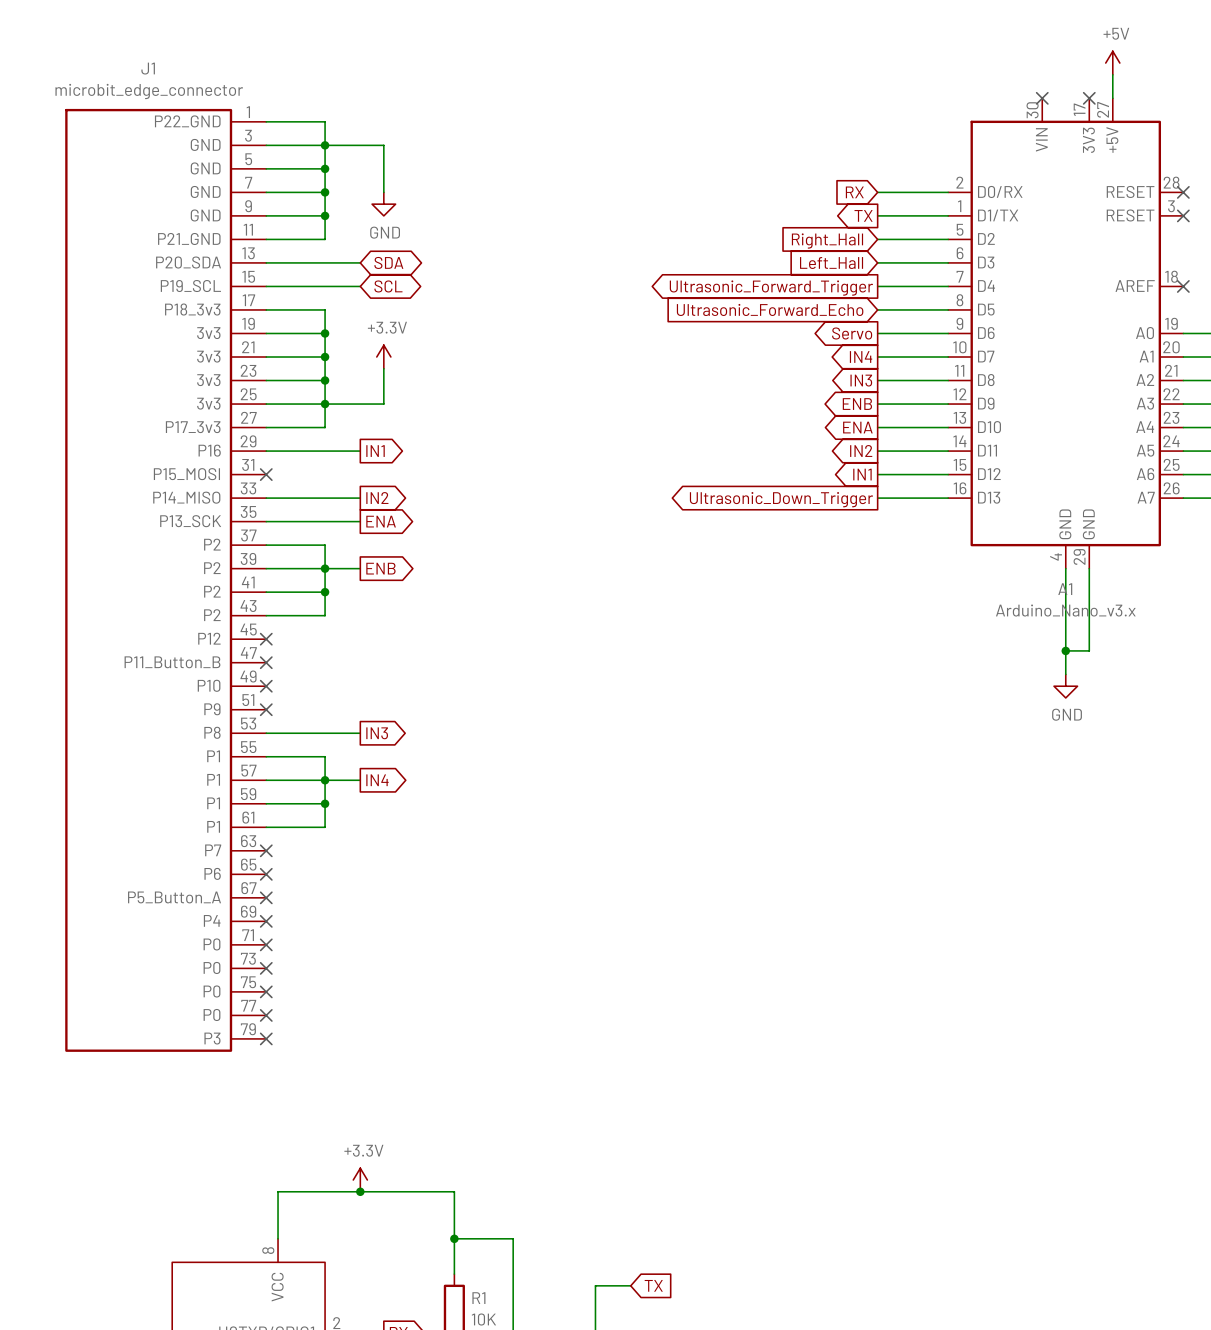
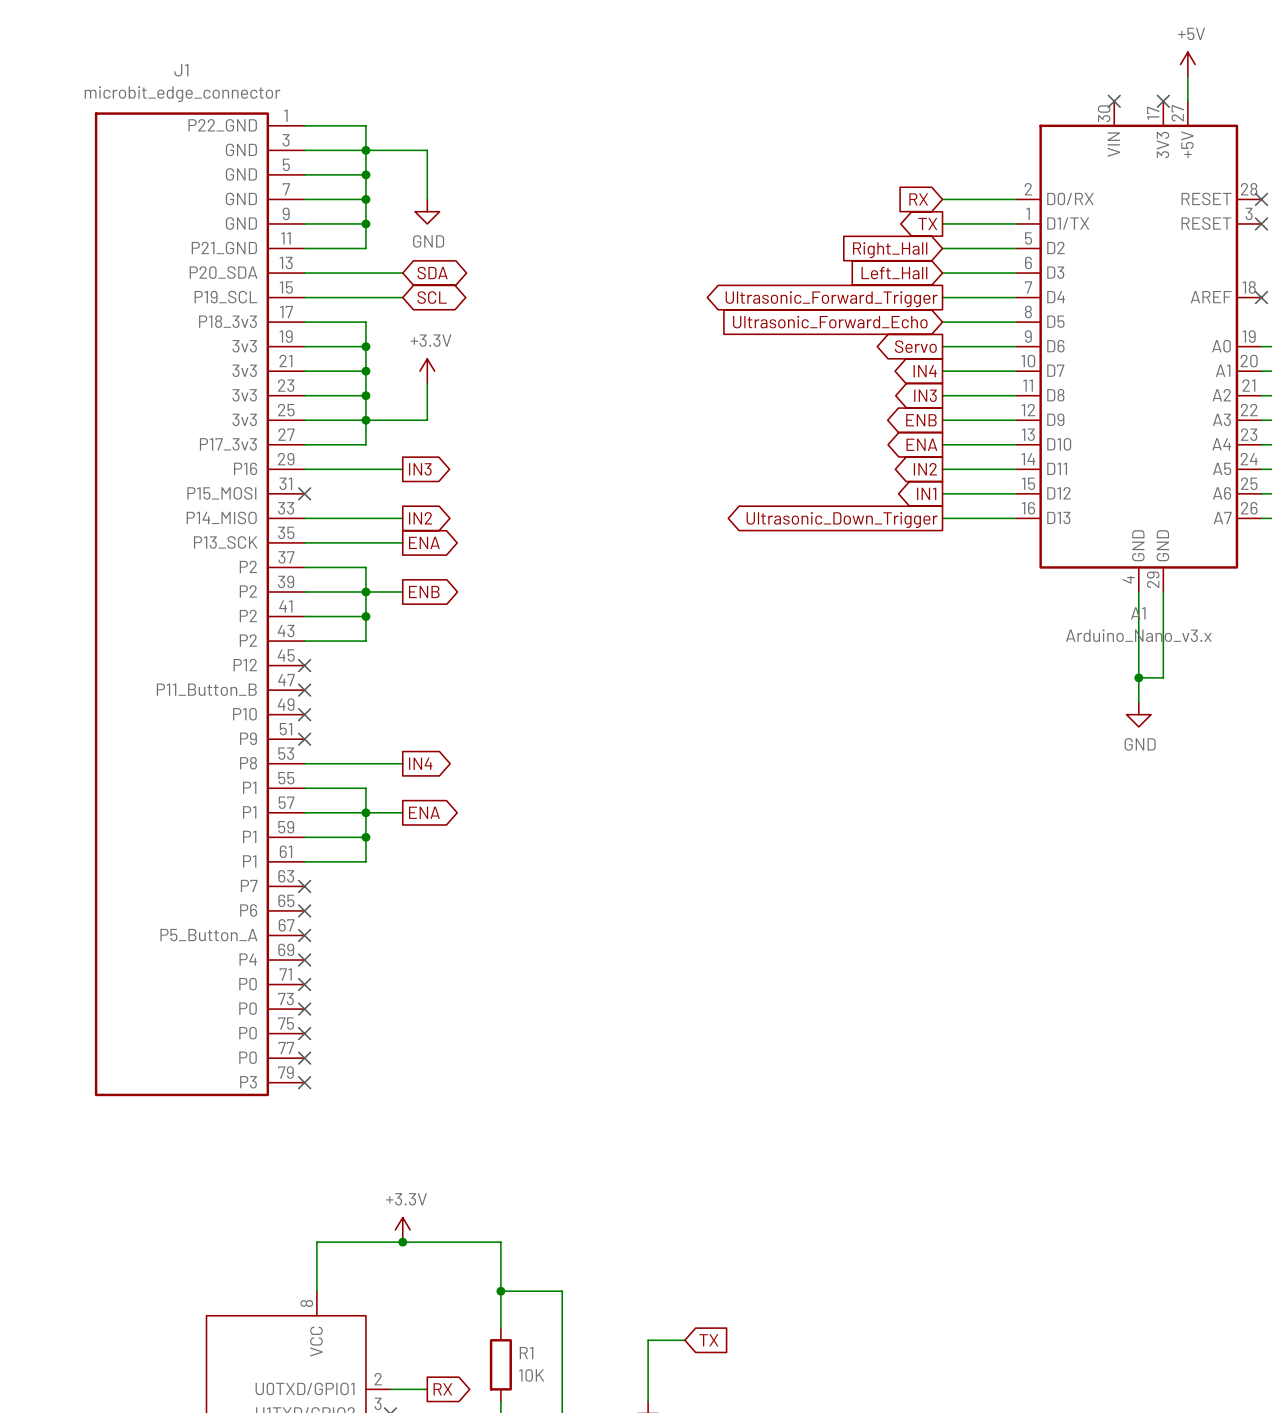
global label: IN1 (375, 451) -> IN3 (420, 469)
global label: IN3 (377, 733) -> IN4 (420, 763)
global label: IN4 (377, 780) -> ENA (424, 812)

